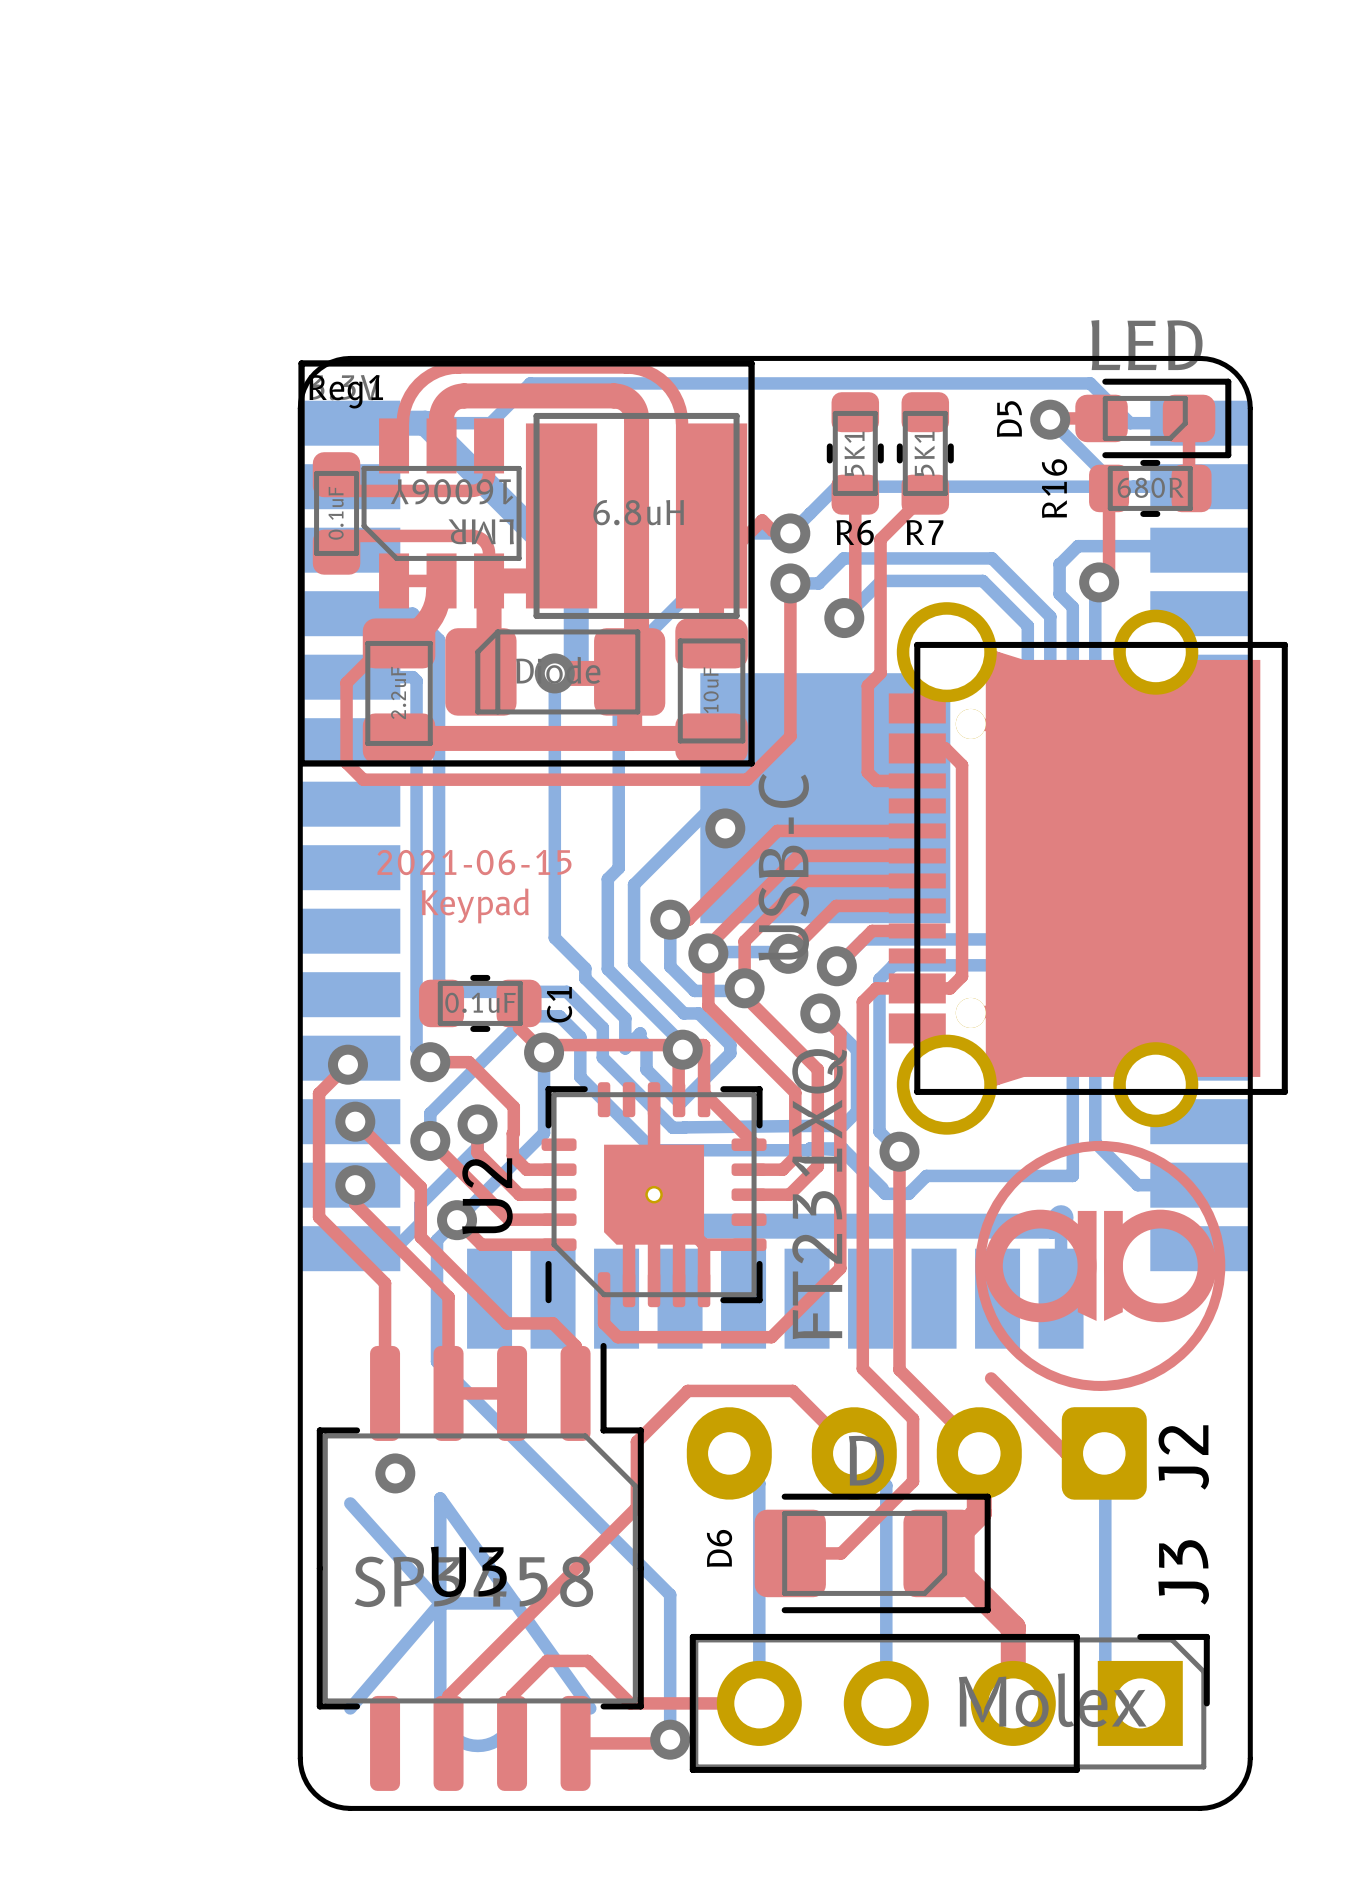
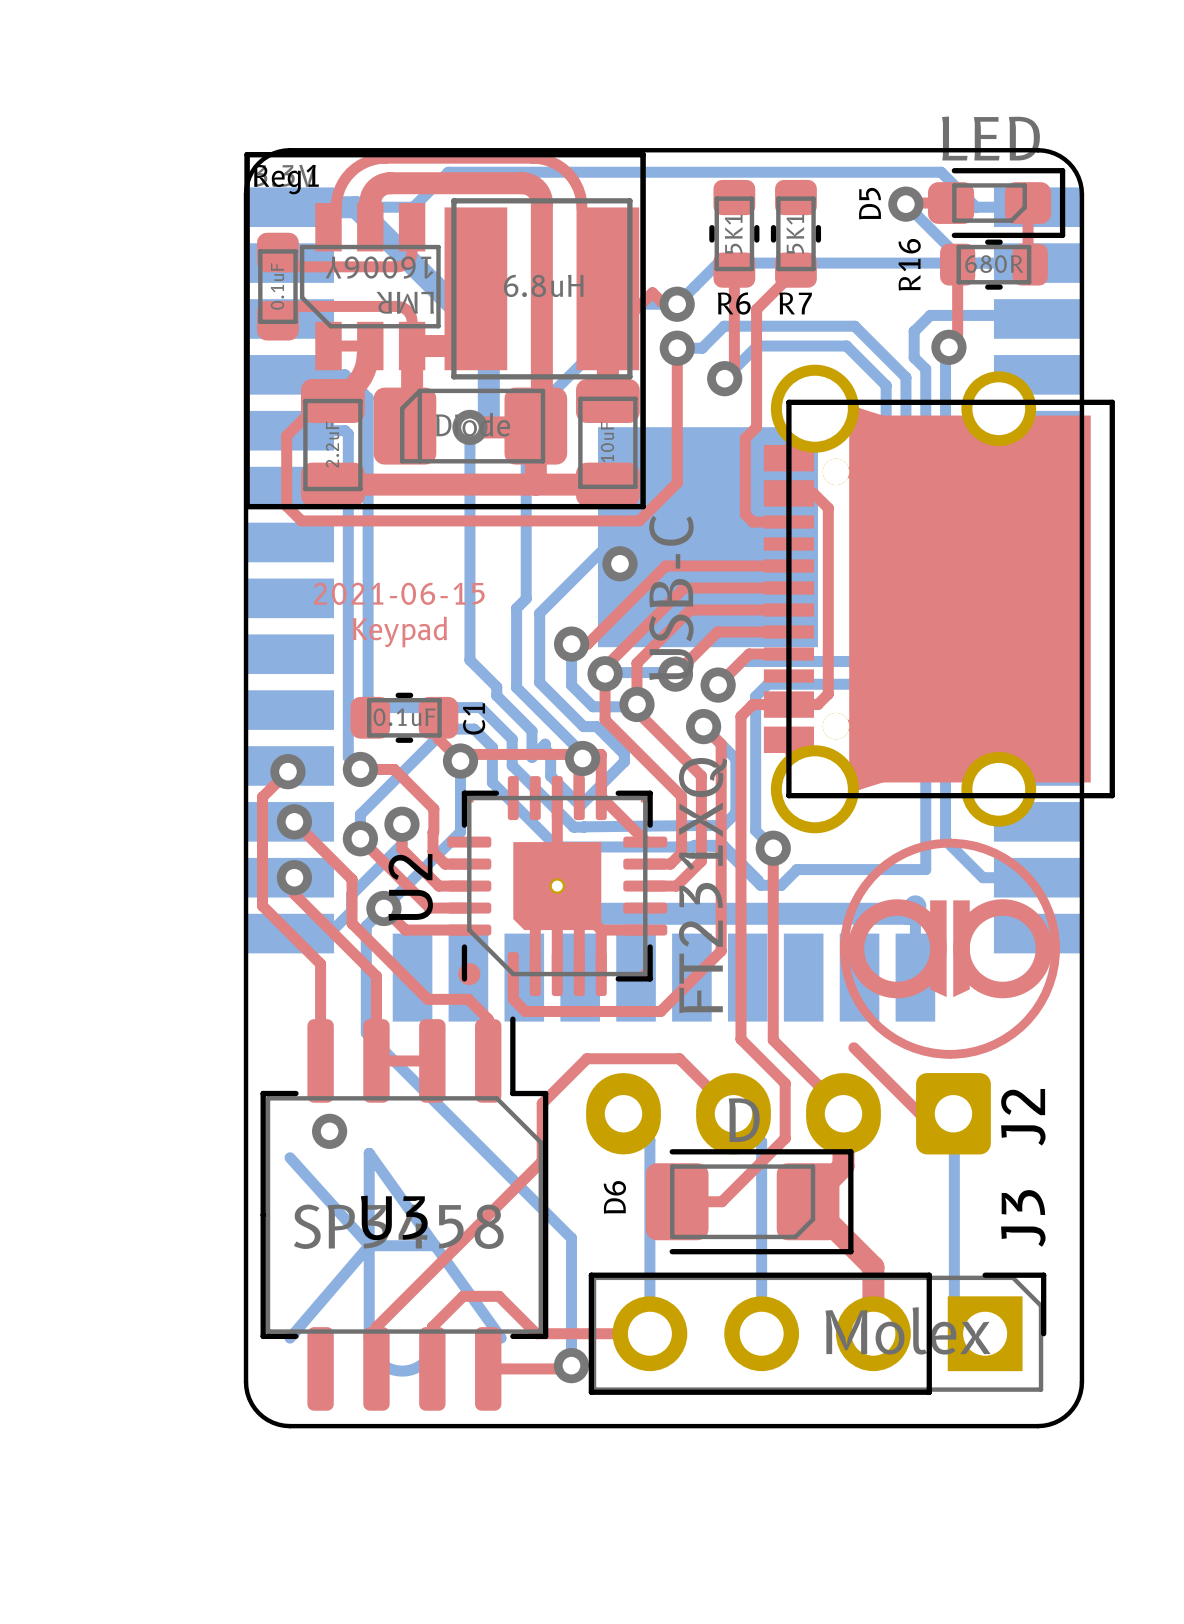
U2 footprint: [541, 1082, 767, 1308] -> [447, 776, 668, 997]

